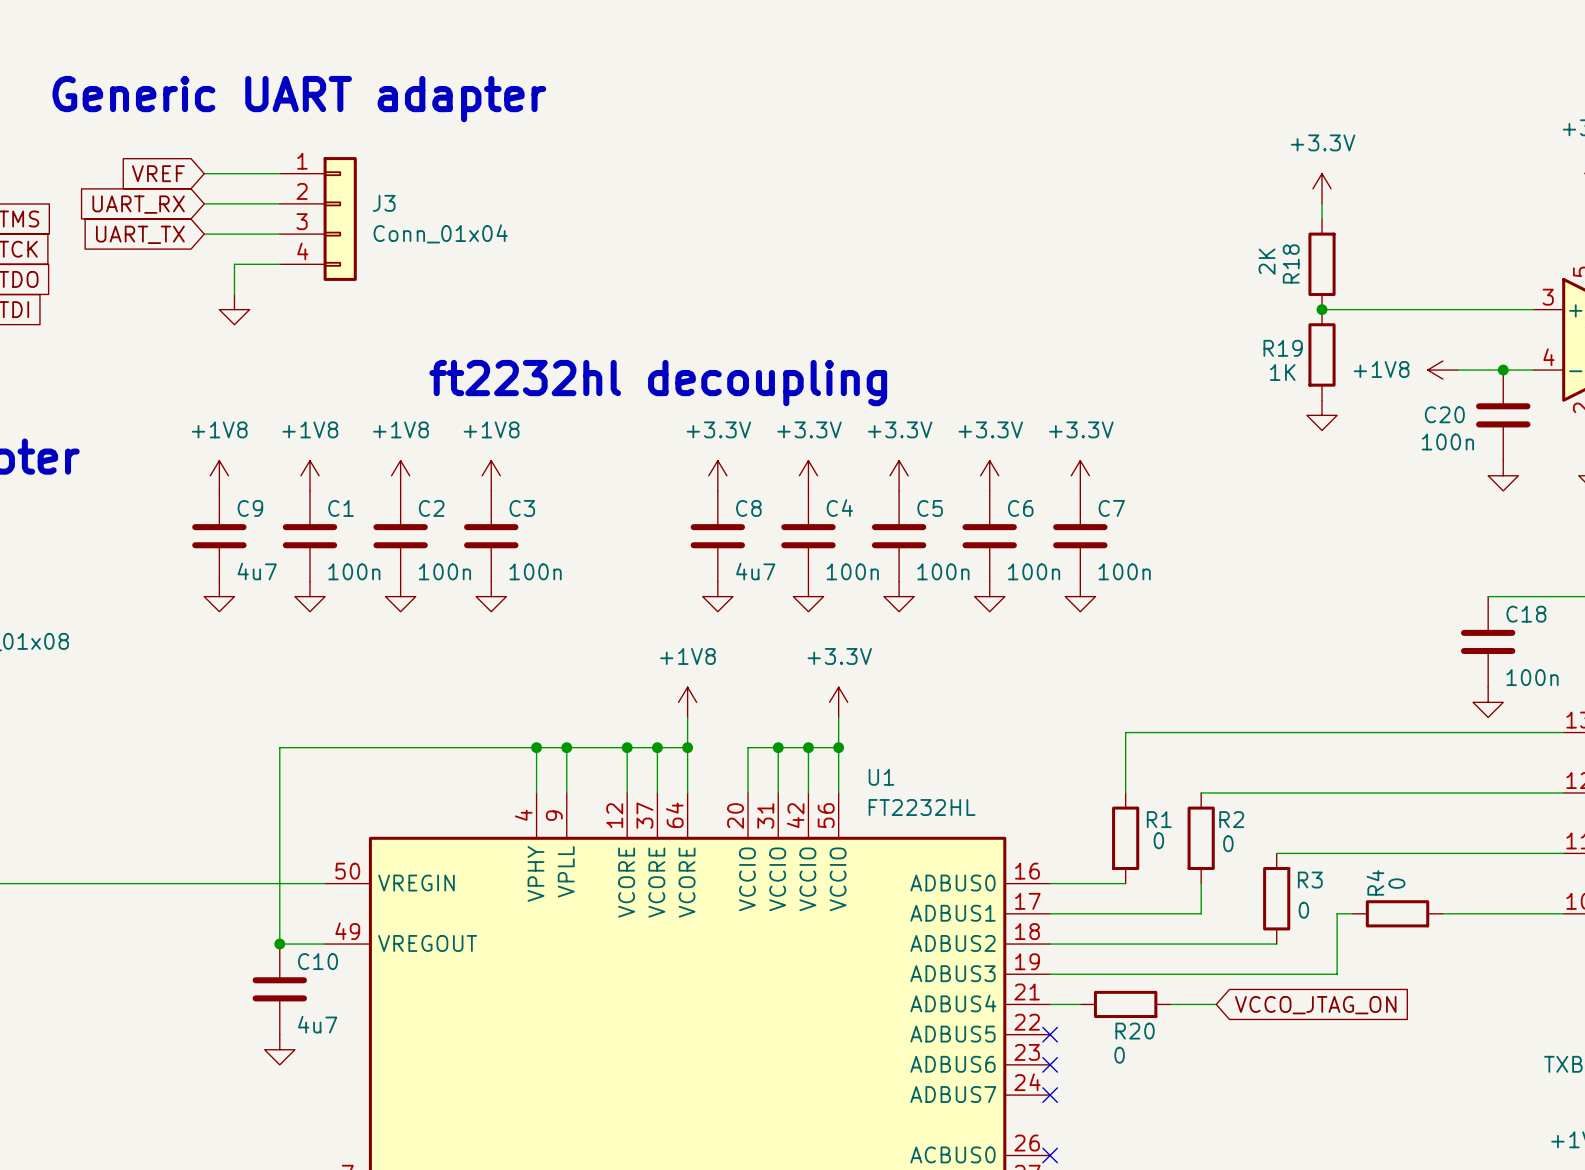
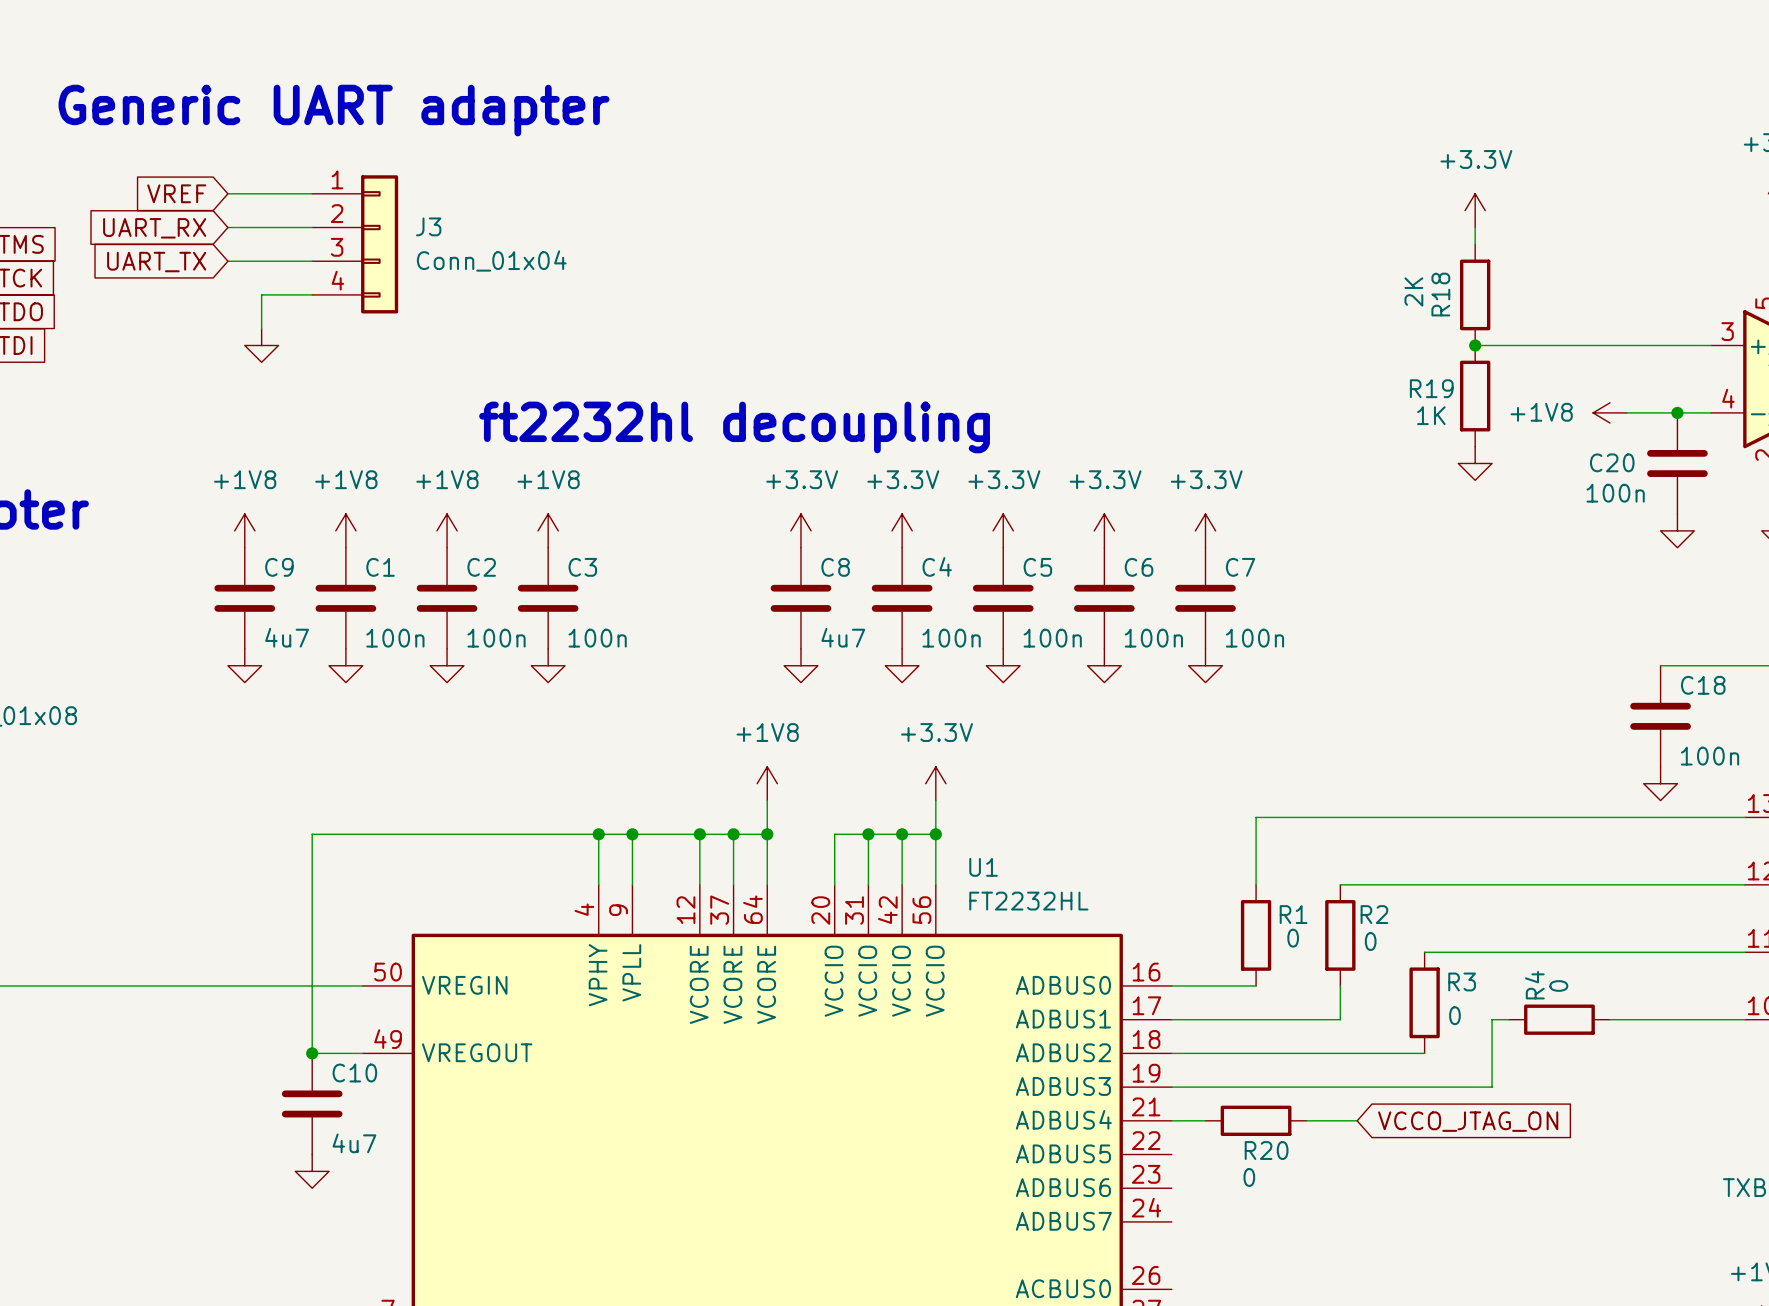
no-connect mark: (1050, 1034) -> none
no-connect mark: (1050, 1064) -> none
no-connect mark: (1050, 1095) -> none
no-connect mark: (1050, 1155) -> none

